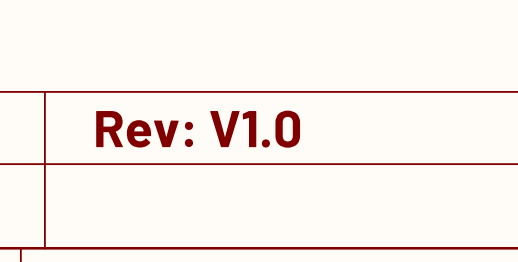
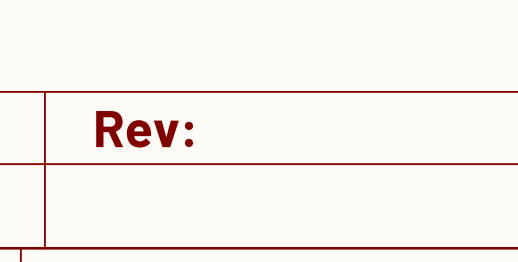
title block: Rev: V1.0 (198, 129) -> Rev: (144, 129)

